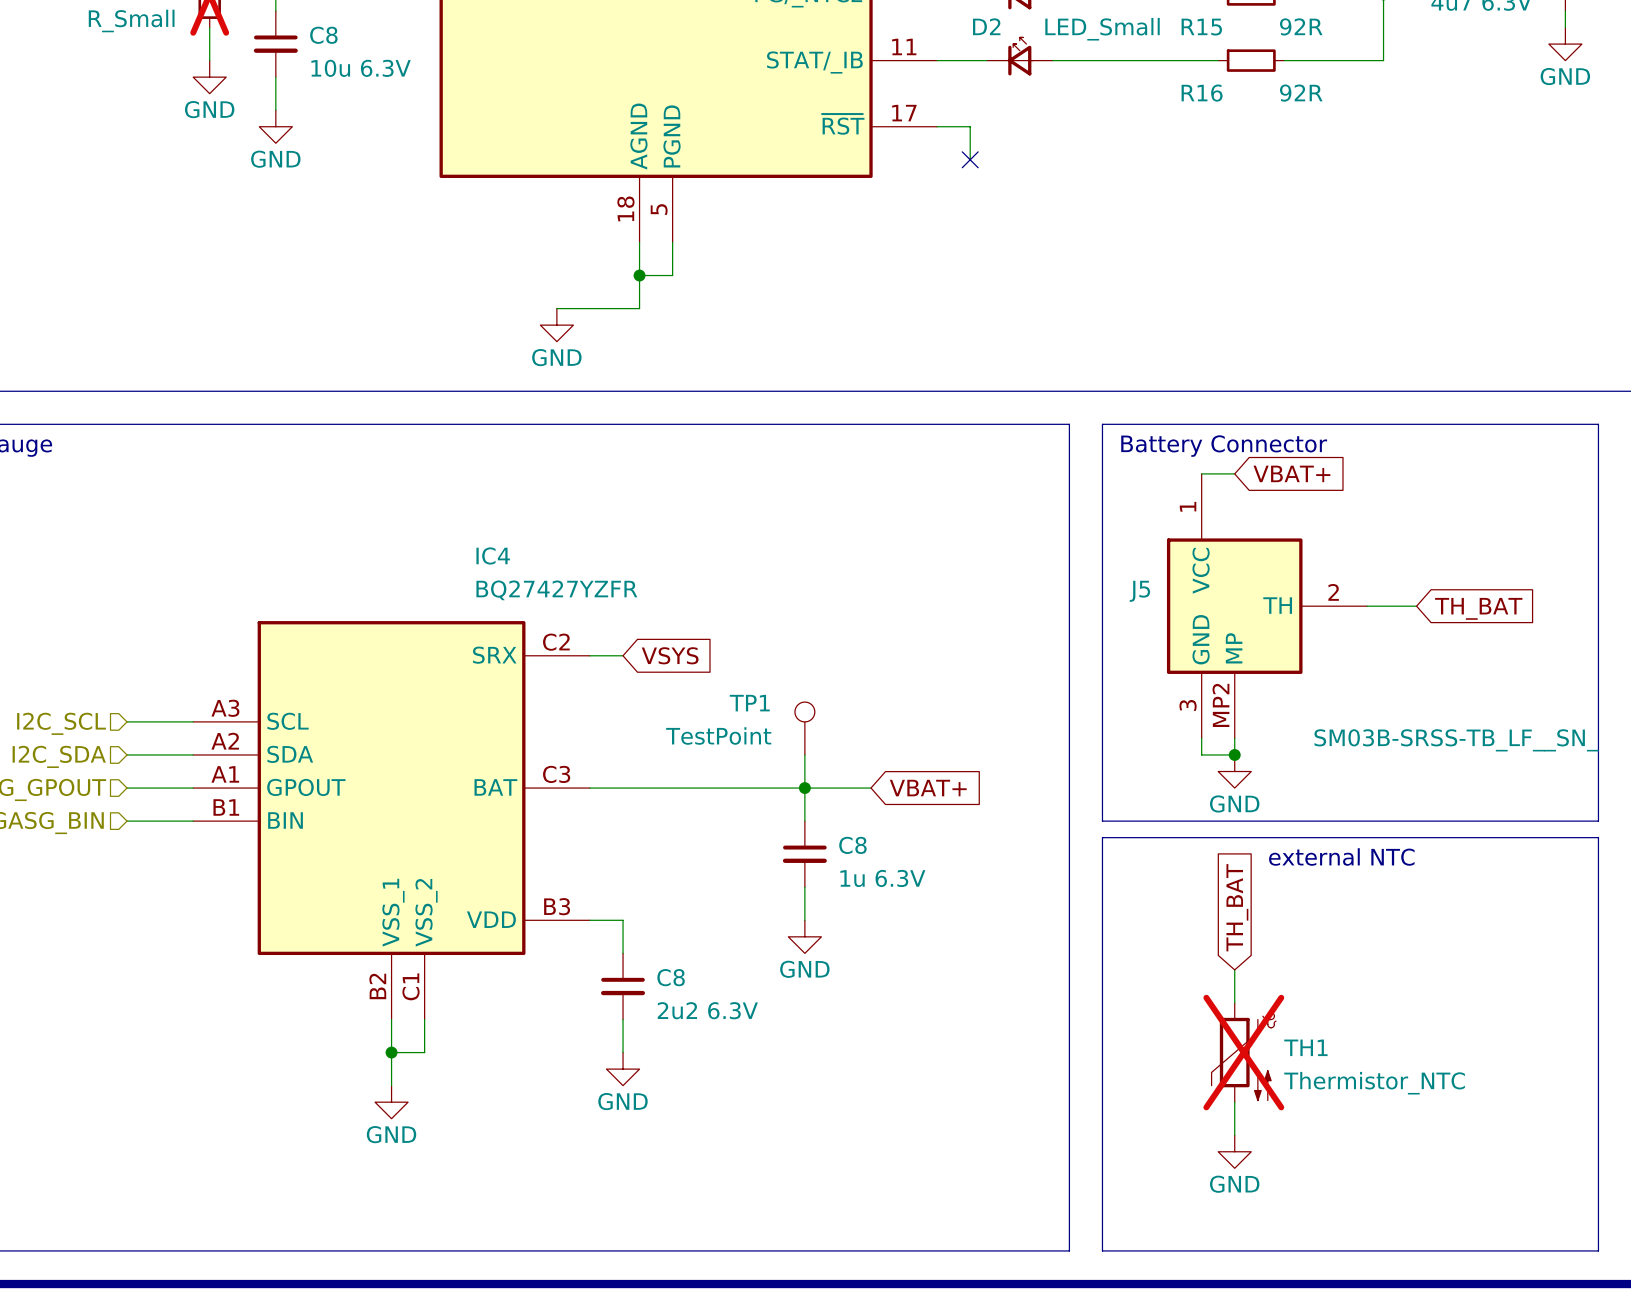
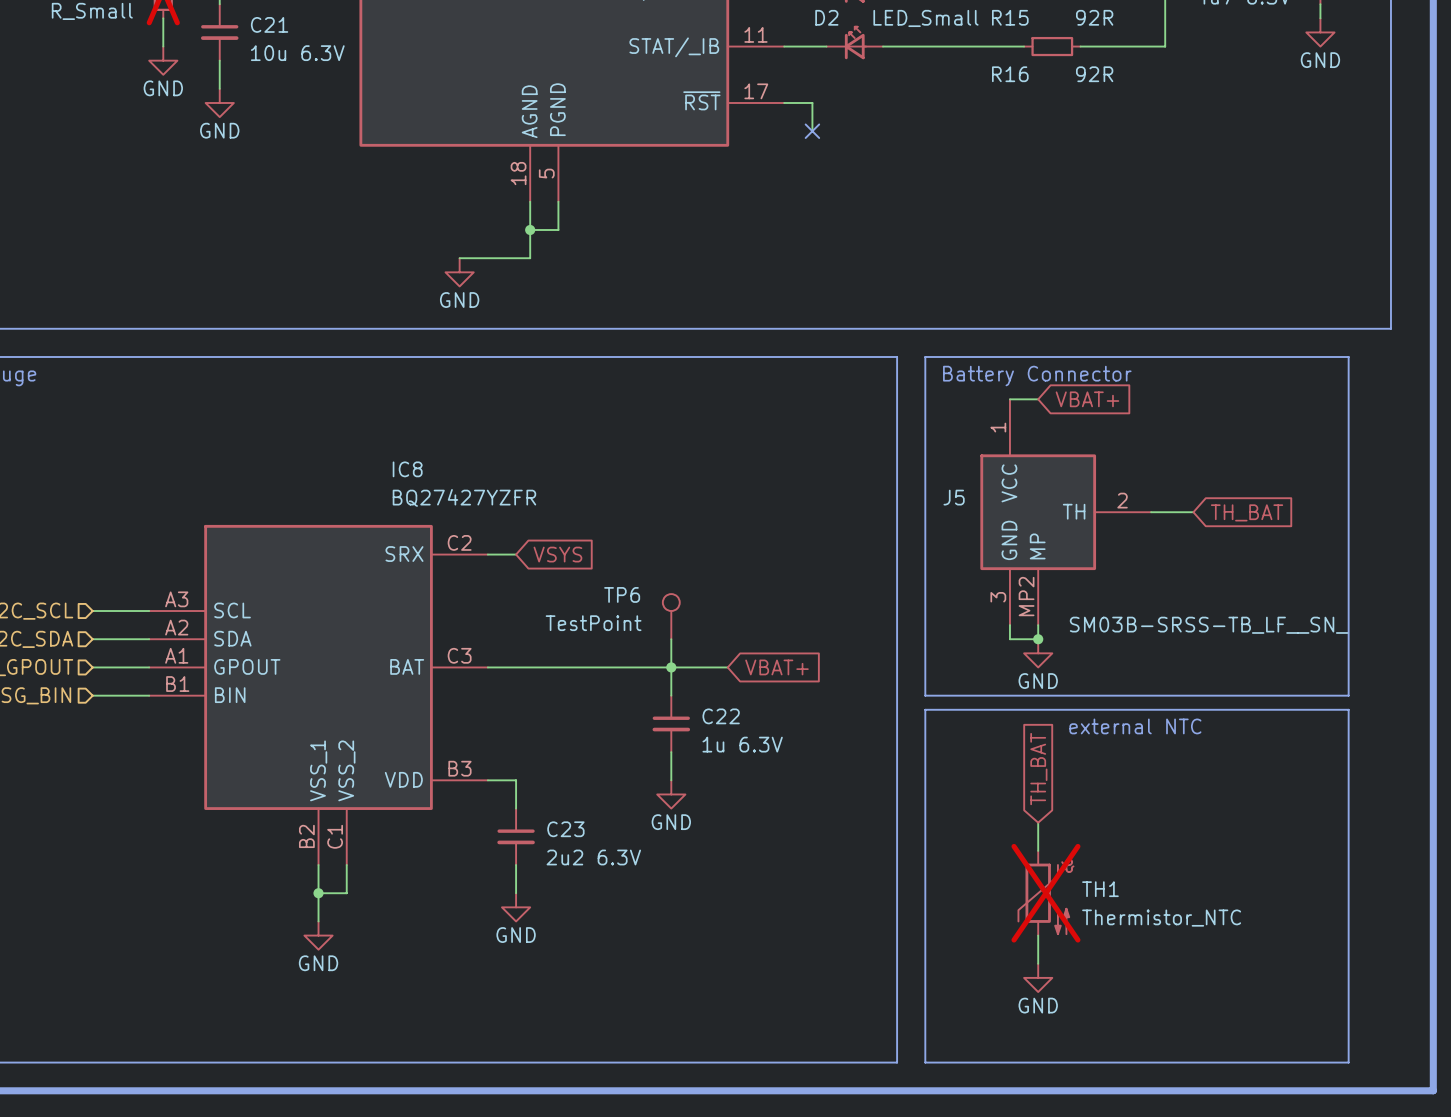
C8 name: C8 (323, 35) -> C21 (269, 24)
IC4 name: IC4 (493, 555) -> IC8 (407, 469)
TP1 name: TP1 (749, 703) -> TP6 (622, 594)
C8 name: C8 (852, 845) -> C22 (721, 716)
C8 name: C8 (671, 977) -> C23 (565, 829)

